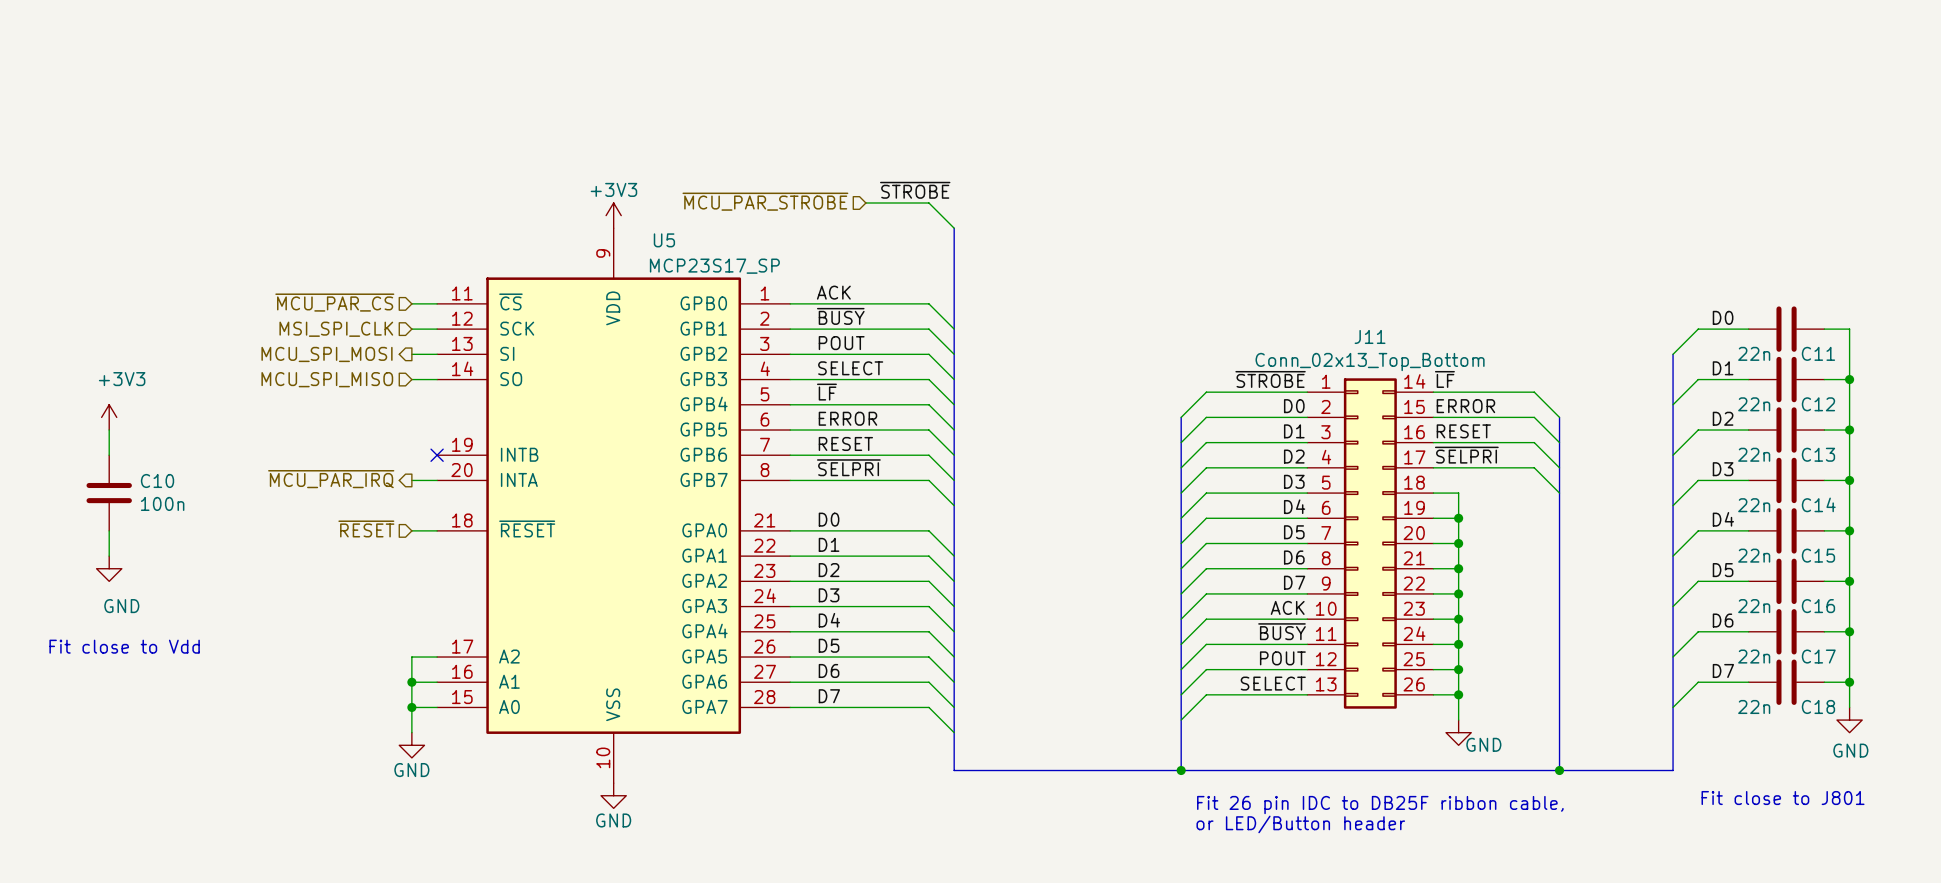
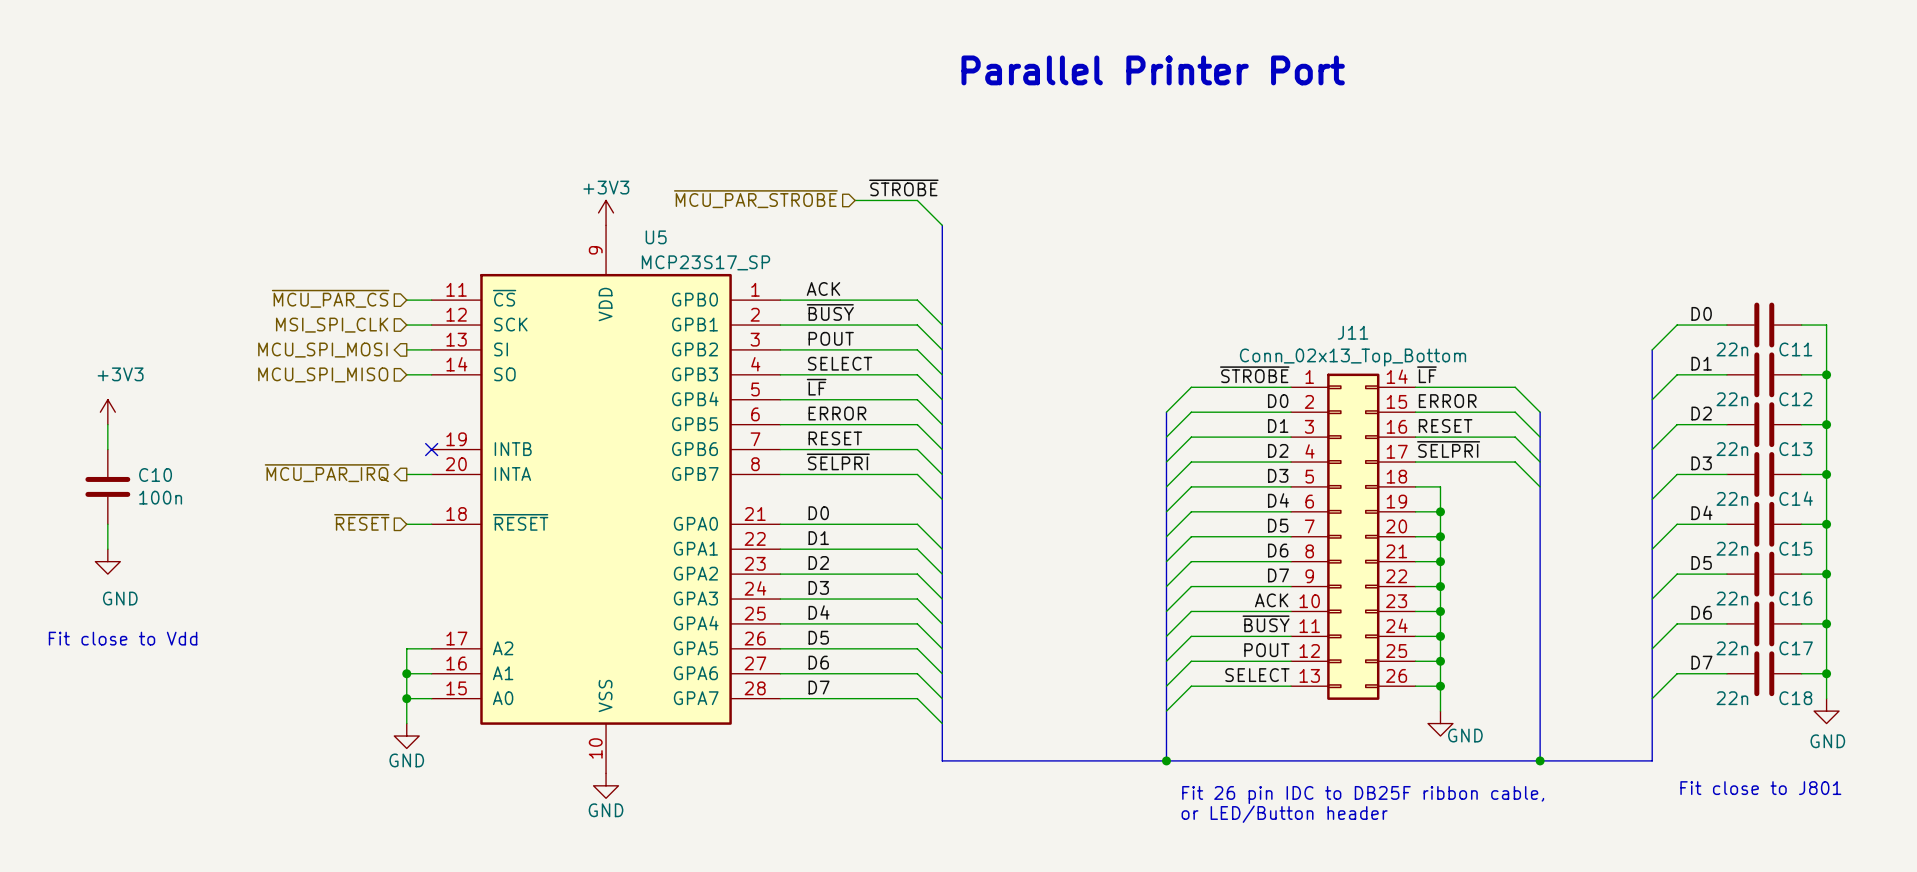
text: none -> Parallel Printer Port (1153, 70)

